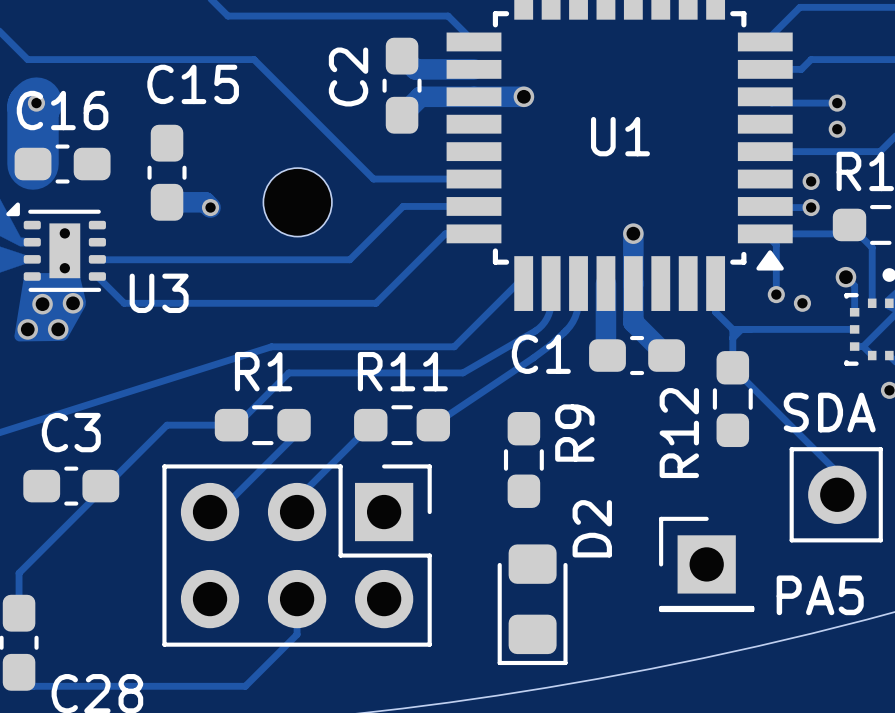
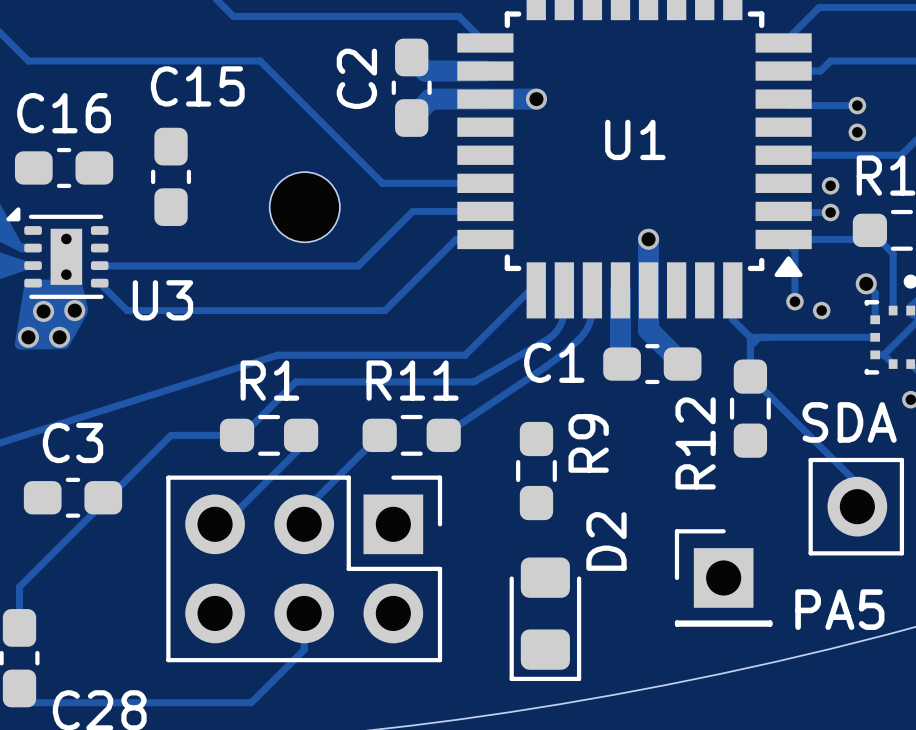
track: (36, 103) (33, 106) (33, 164) -> none
via: (36, 103) -> none
track: (167, 202) (205, 202) (210, 207) -> none
via: (210, 207) -> none

